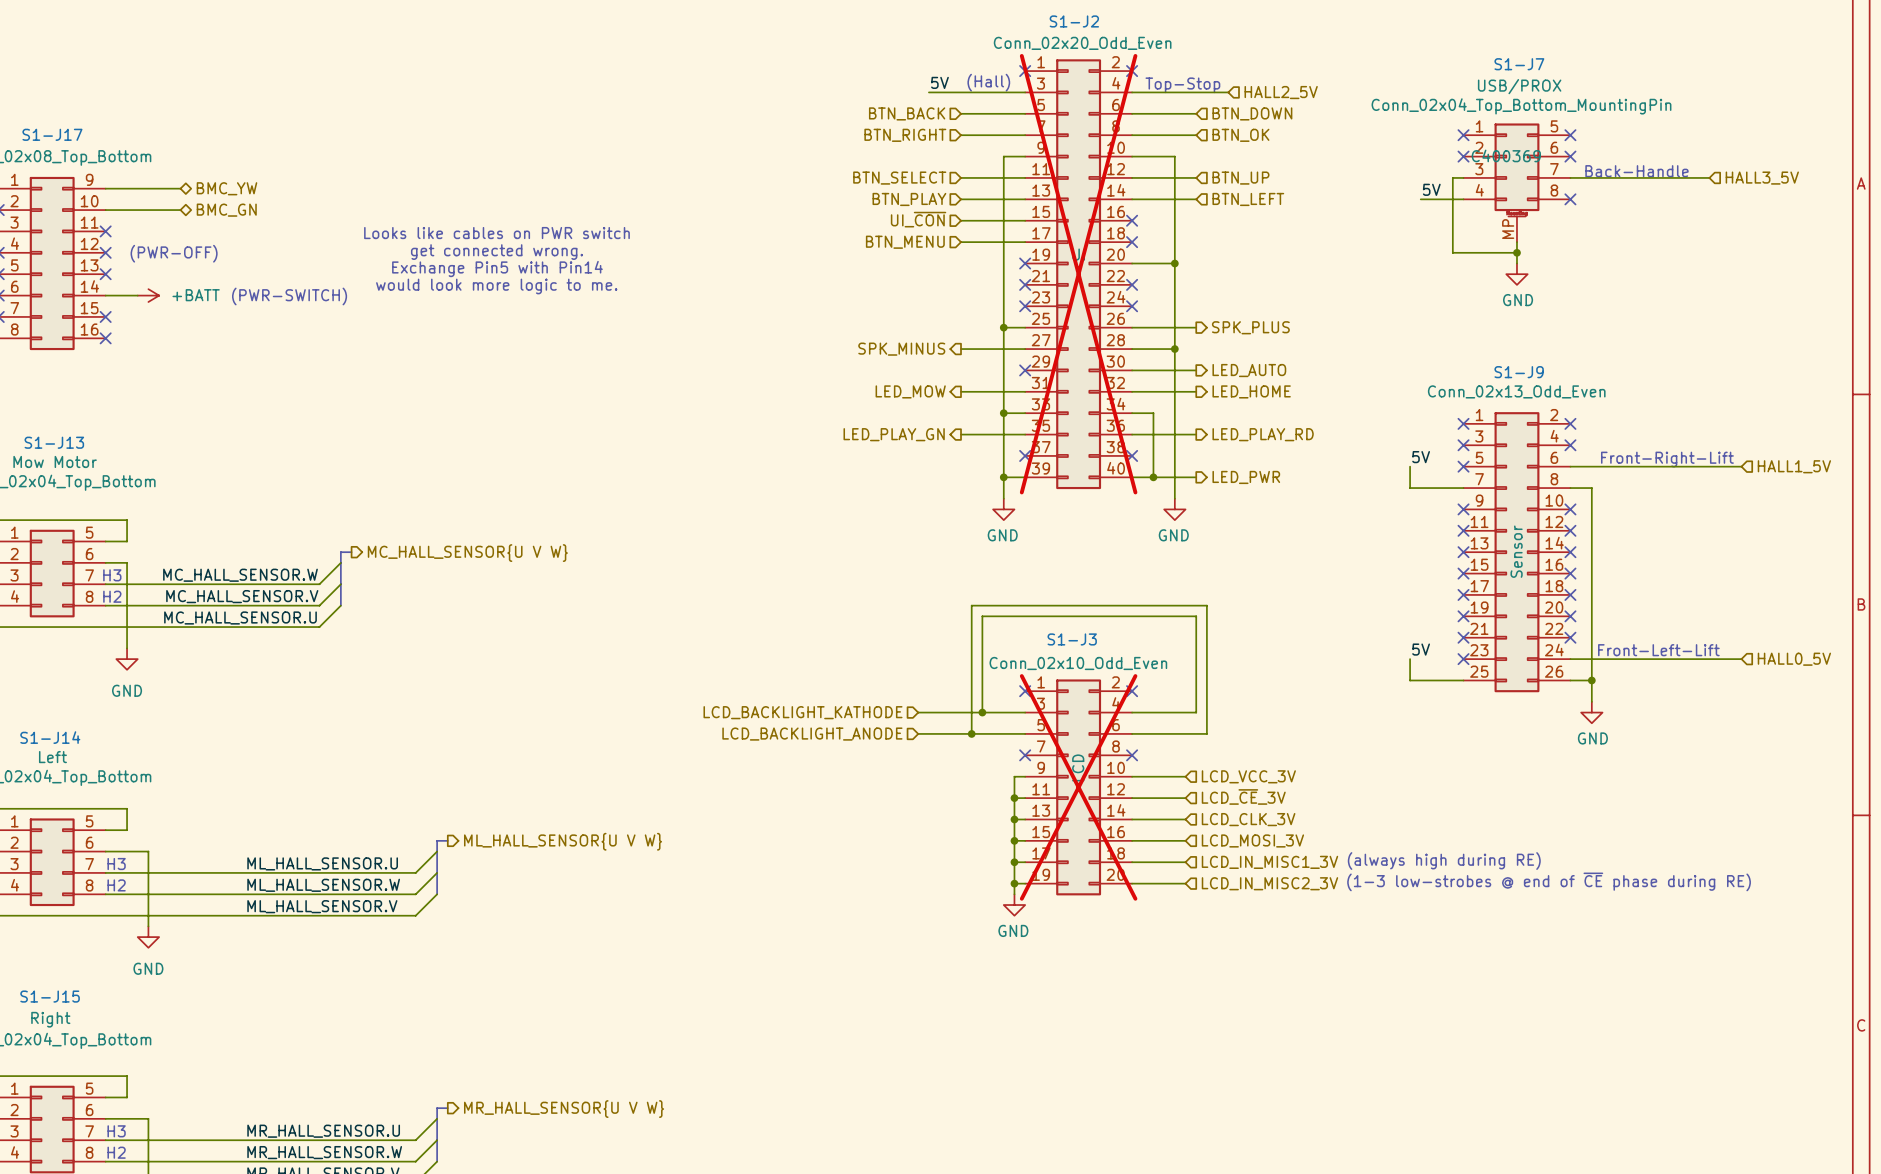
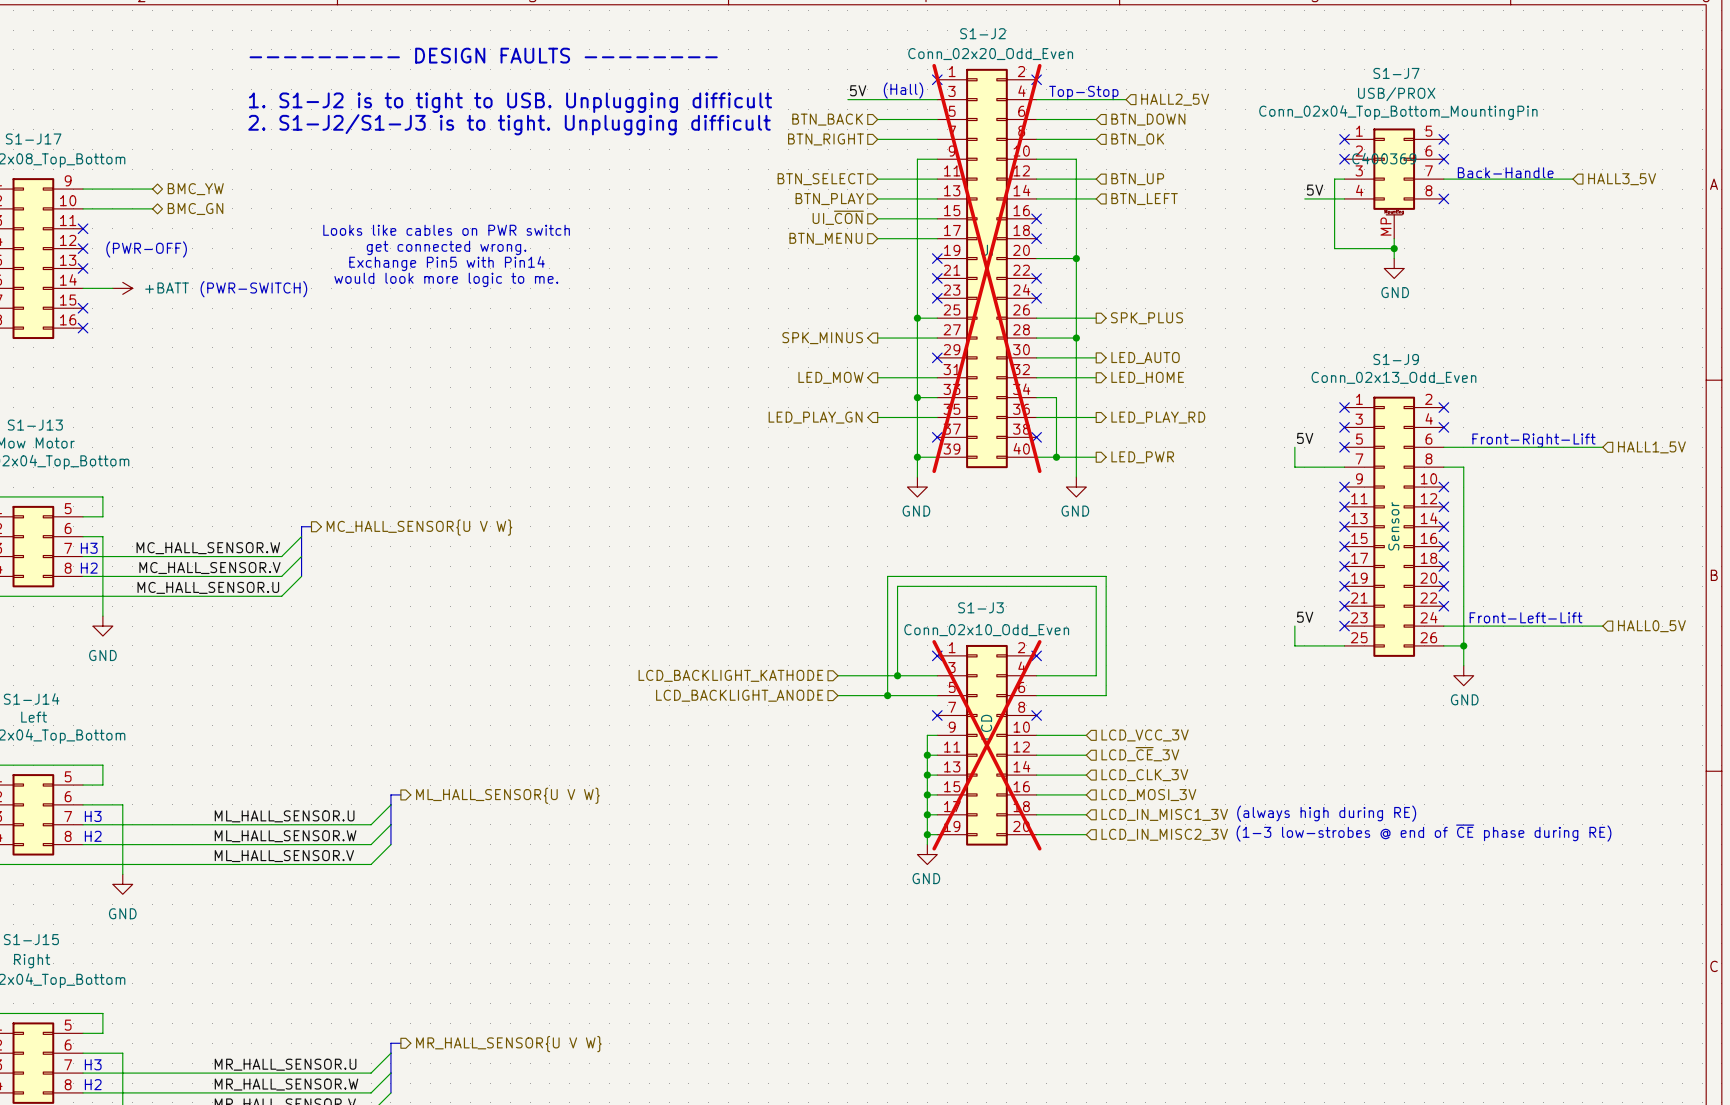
text: none -> --------- DESIGN FAULTS -------- (483, 55)
text: none -> 1. S1-J2 is to tight to USB. Unplugging difficult (510, 102)
text: none -> 2. S1-J2/S1-J3 is to tight. Unplugging difficult (509, 124)

